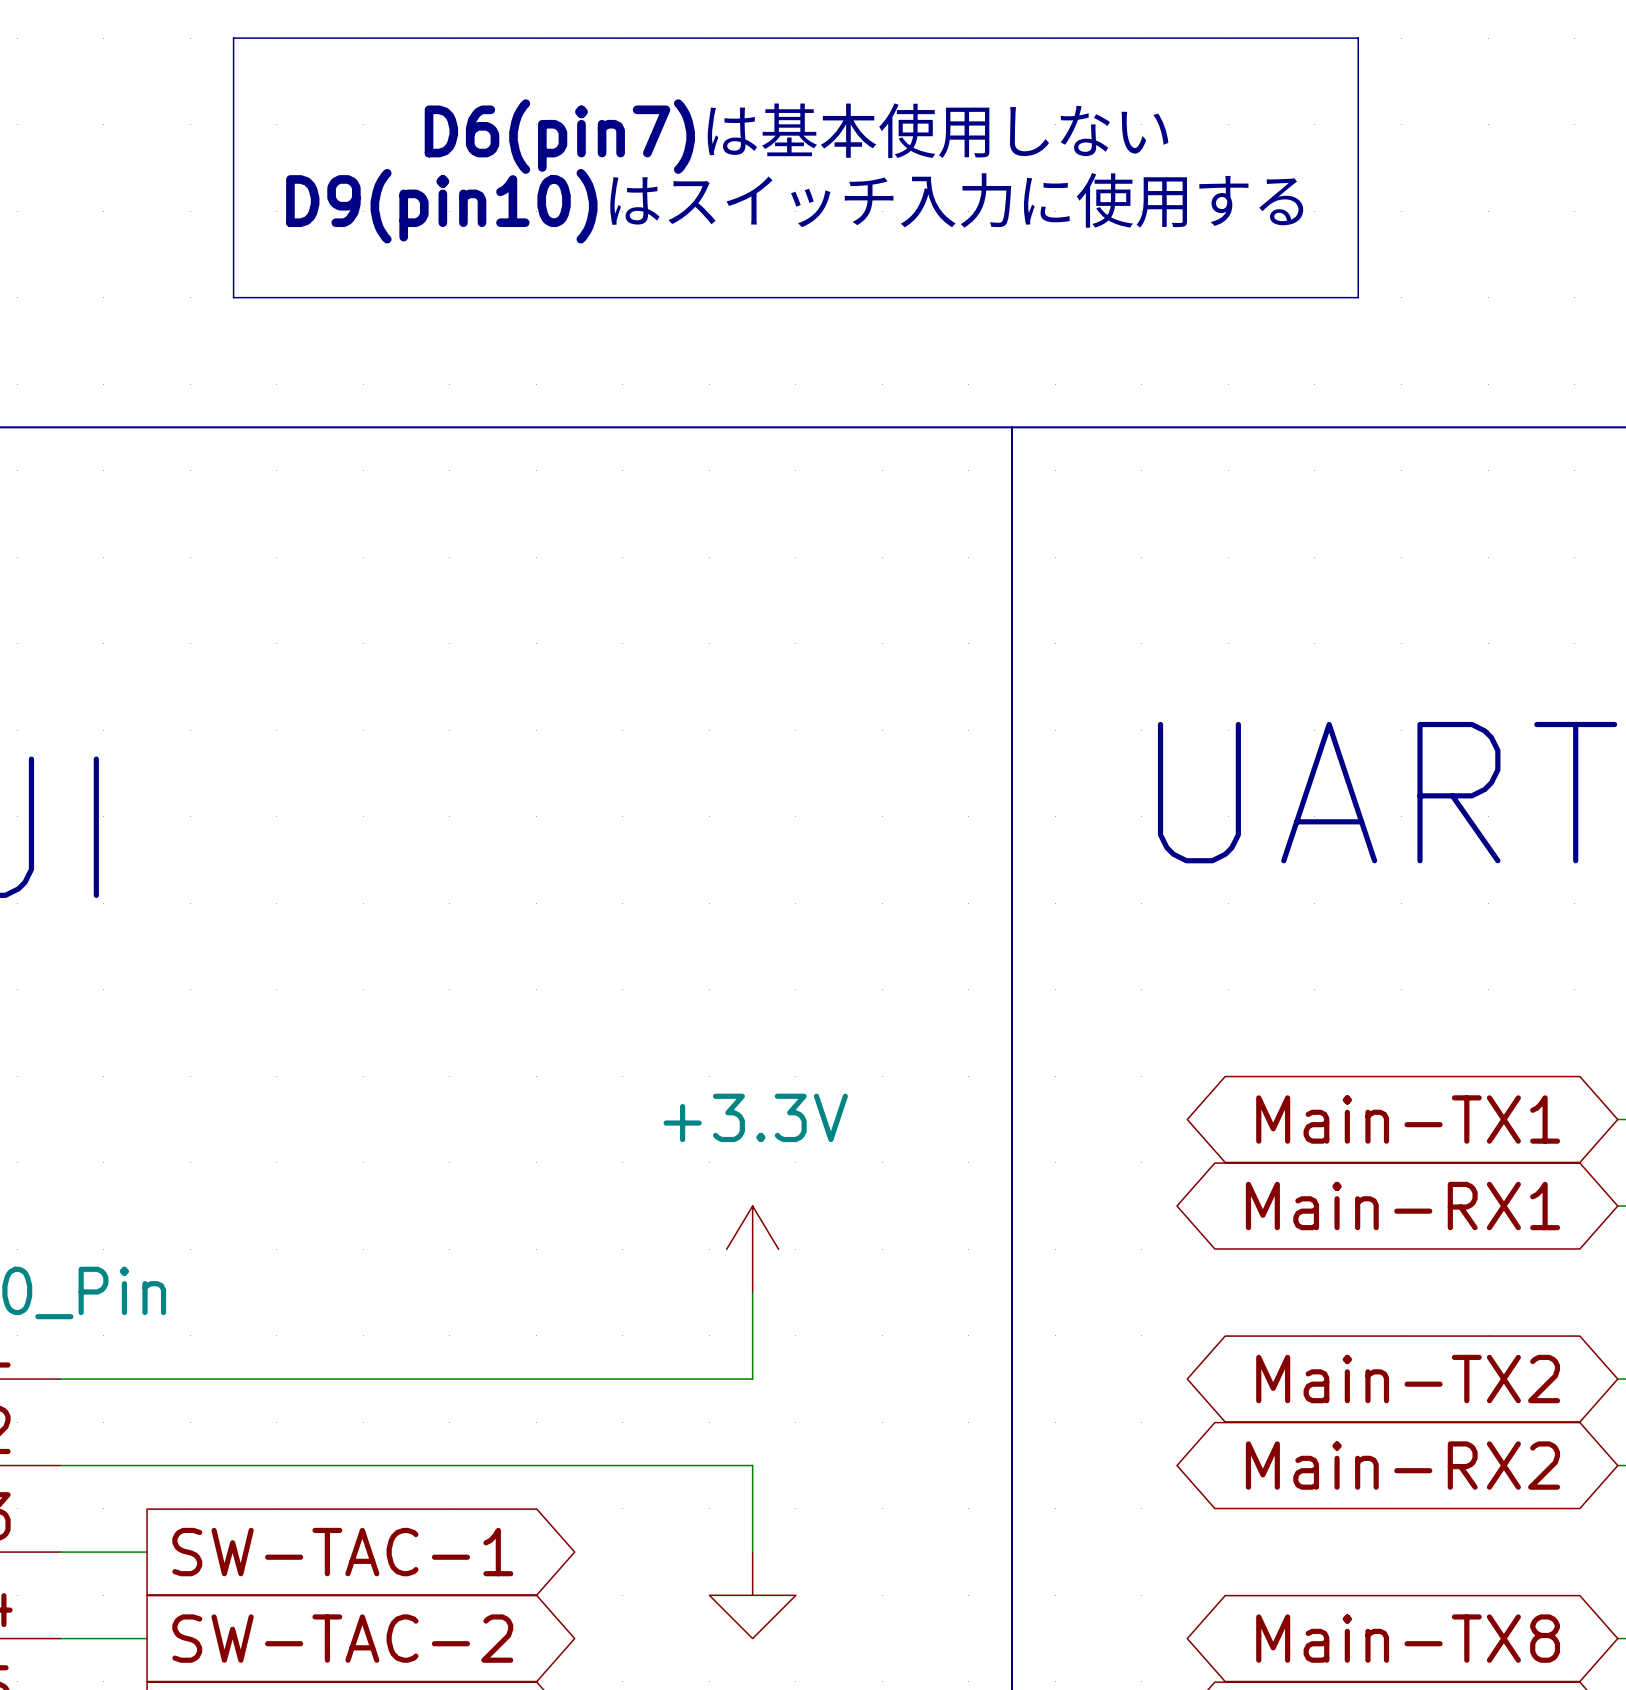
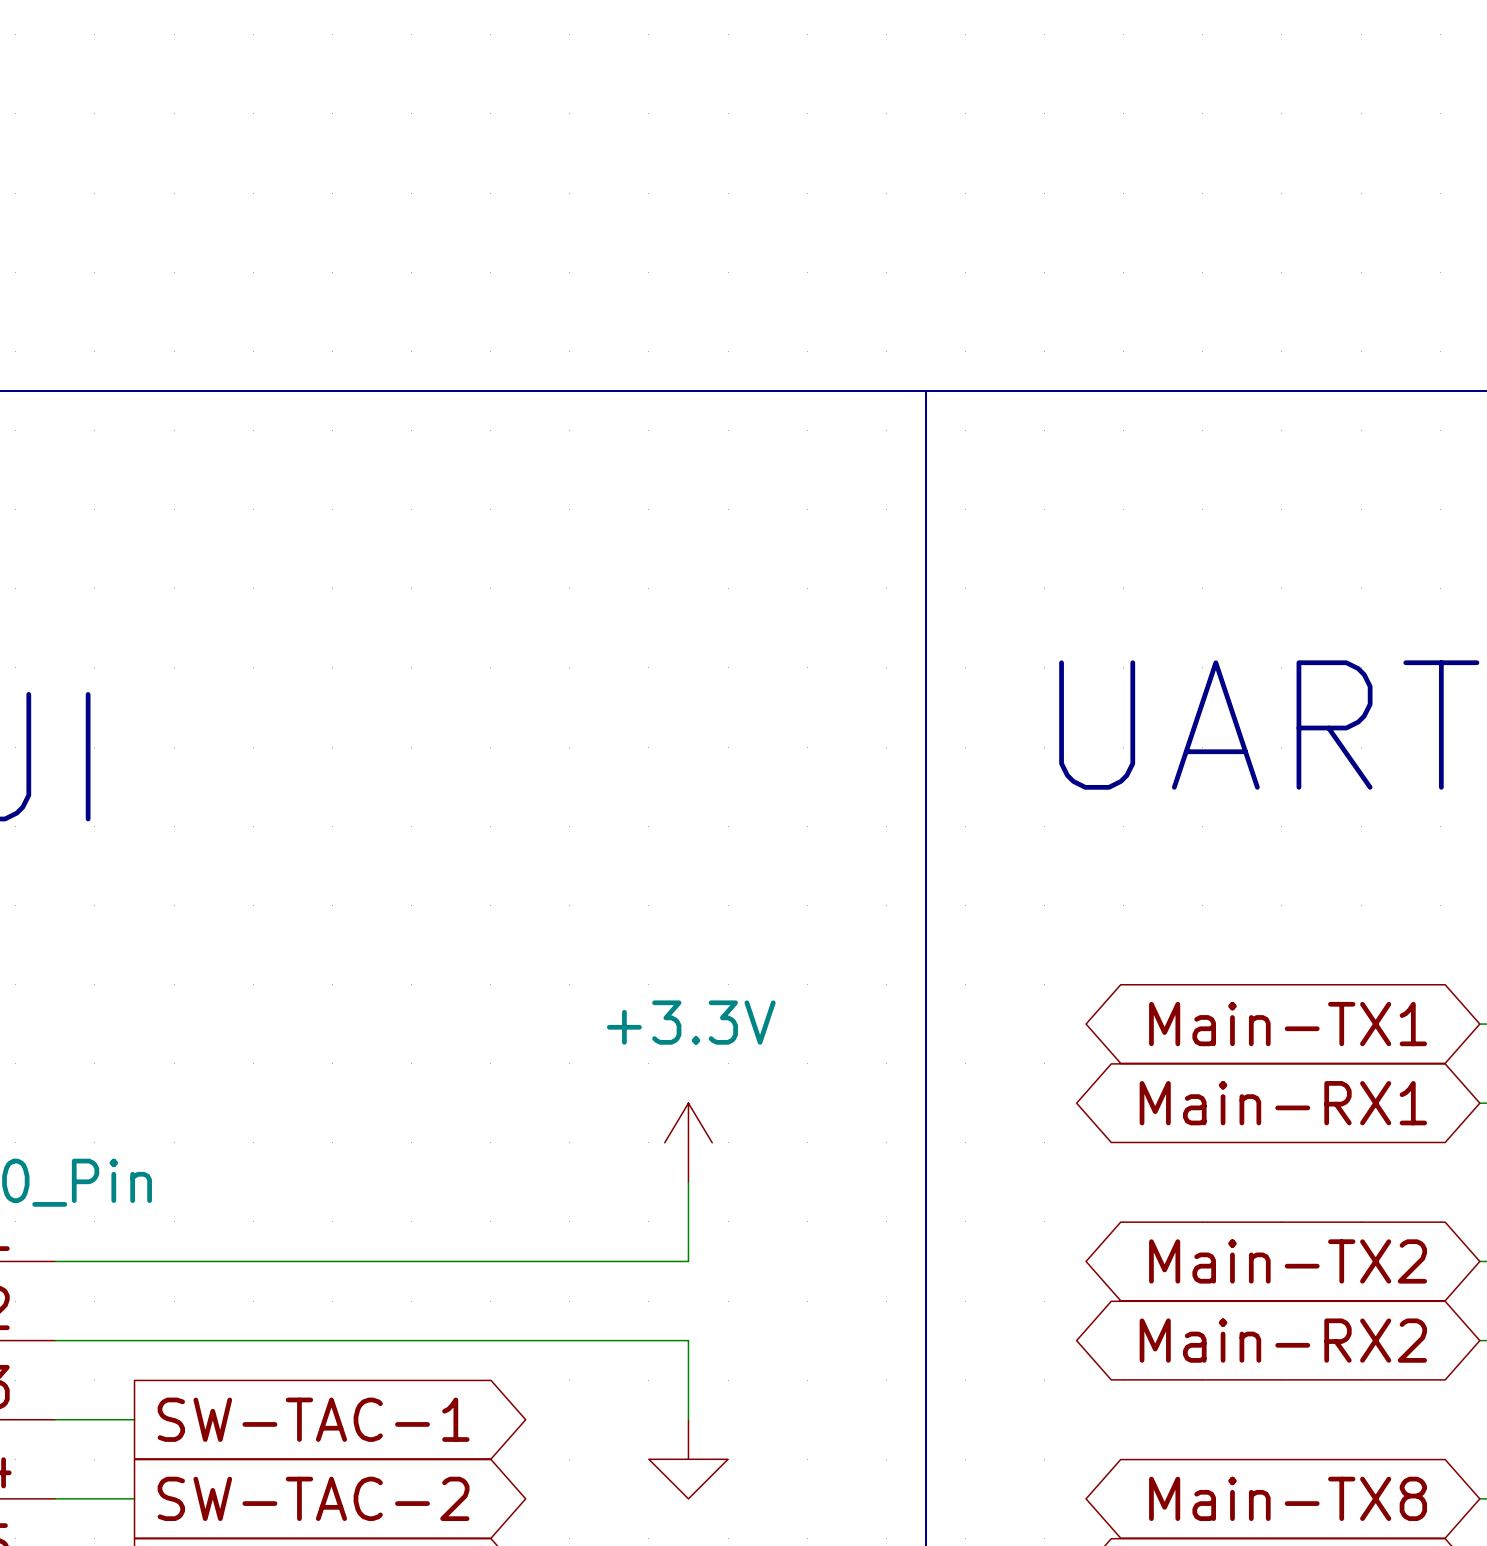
line: (233, 38) (1358, 38) (1358, 297) (233, 297) (233, 38) -> none
text: D6(pin7)は基本使用しない (798, 136) -> none
text: D9(pin10)はスイッチ入力に使用する (796, 206) -> none

